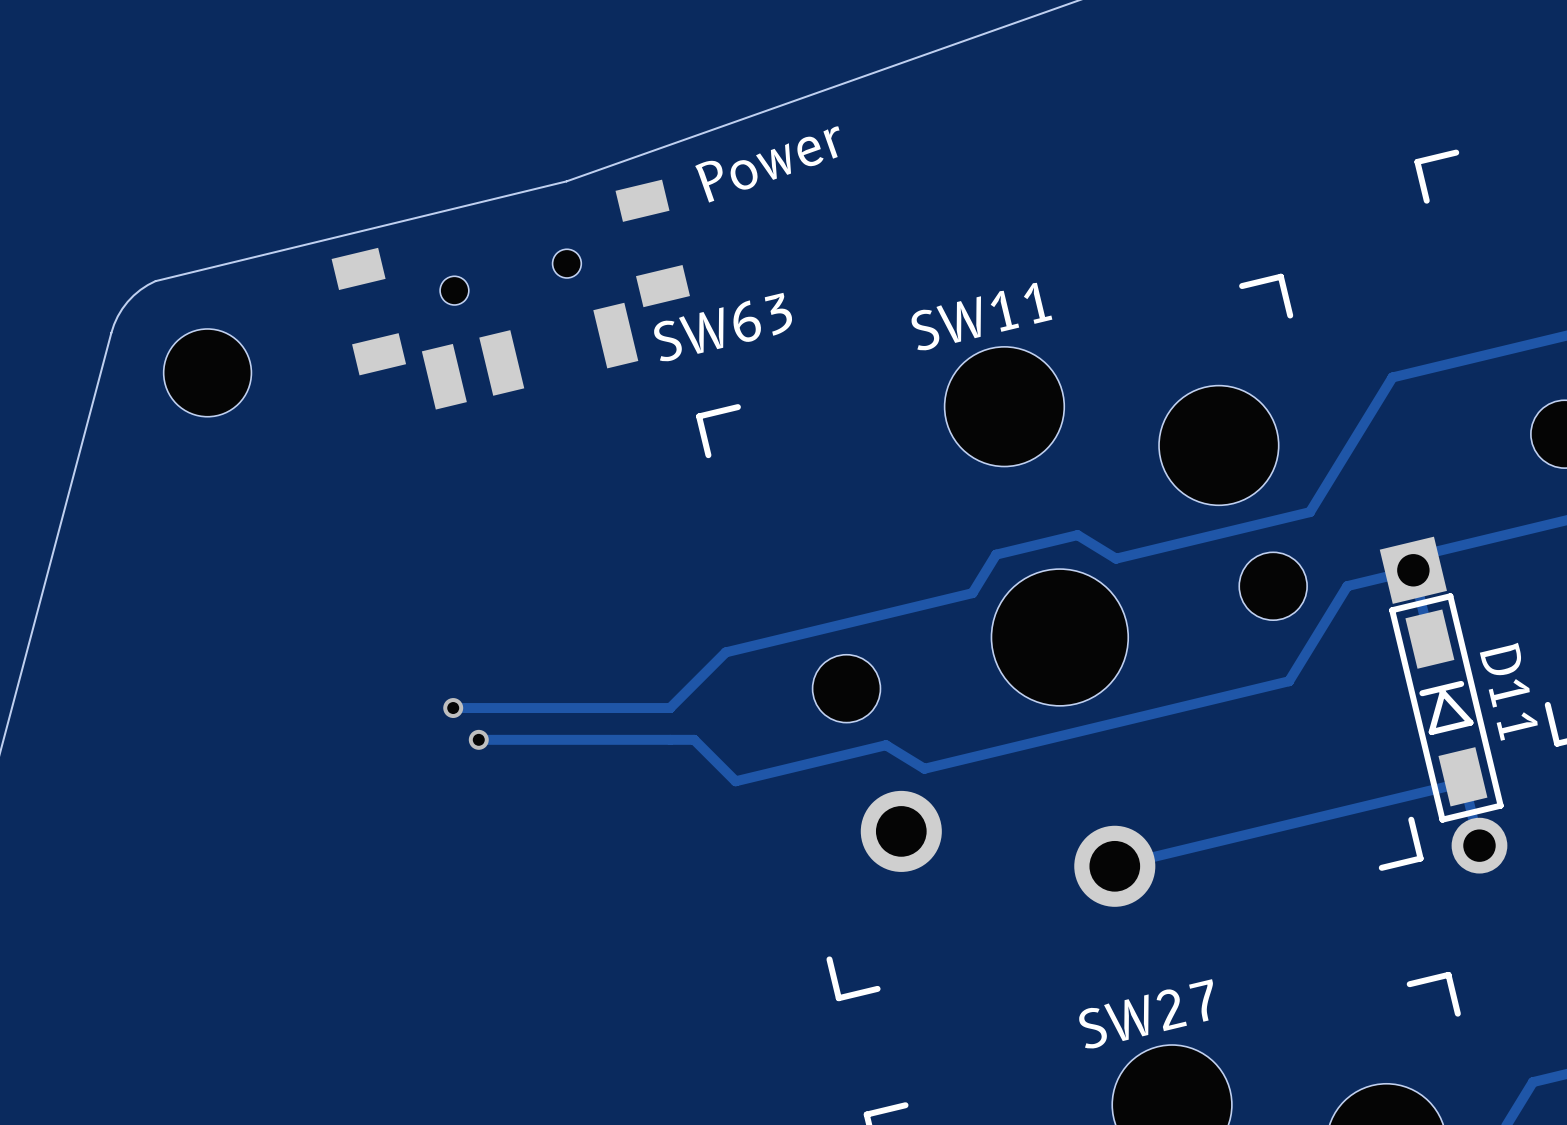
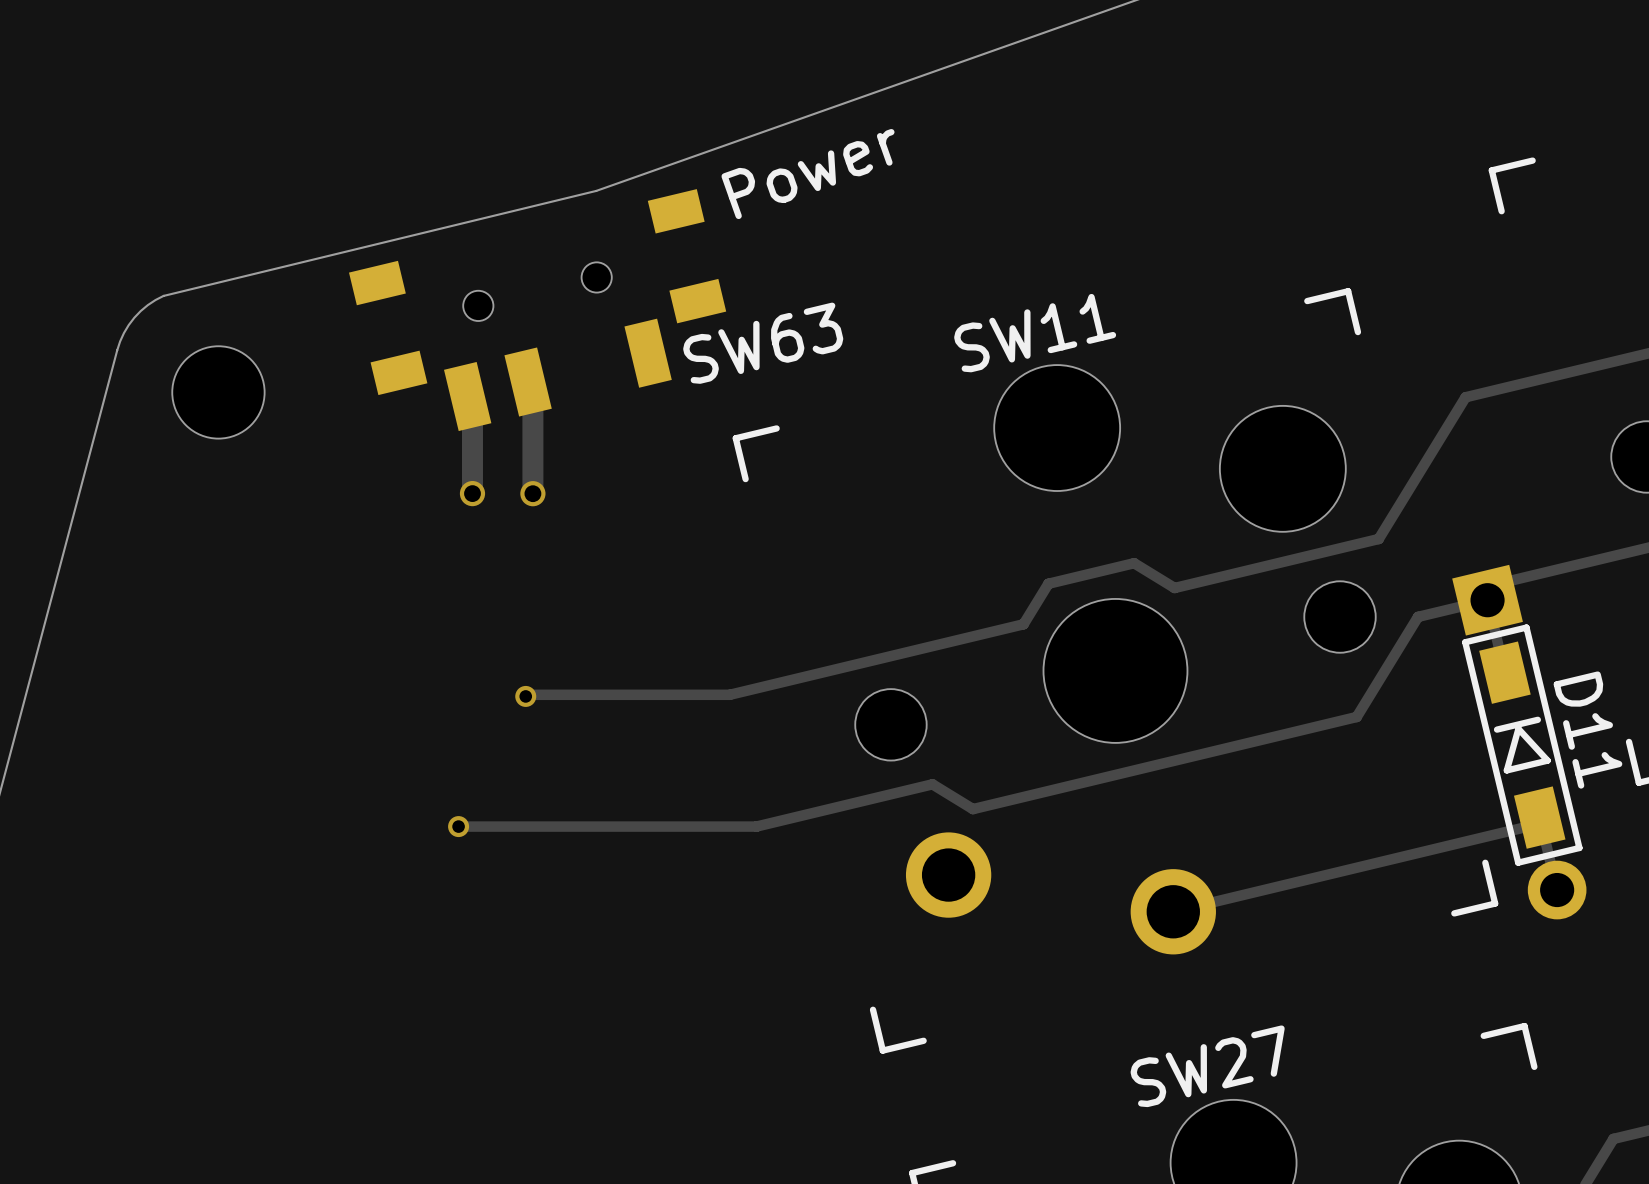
track: none -> (532, 395) (532, 493)
track: none -> (472, 409) (472, 493)
via: none -> (472, 493)
via: none -> (532, 493)
track: (725, 652) (670, 707) (453, 708) -> (763, 686) (729, 694) (527, 694)
via: none -> (525, 696)
via: (453, 708) -> none
track: (478, 739) (694, 739) (735, 781) -> (458, 826) (756, 826) (774, 822)
via: (478, 739) -> none
via: none -> (458, 826)

